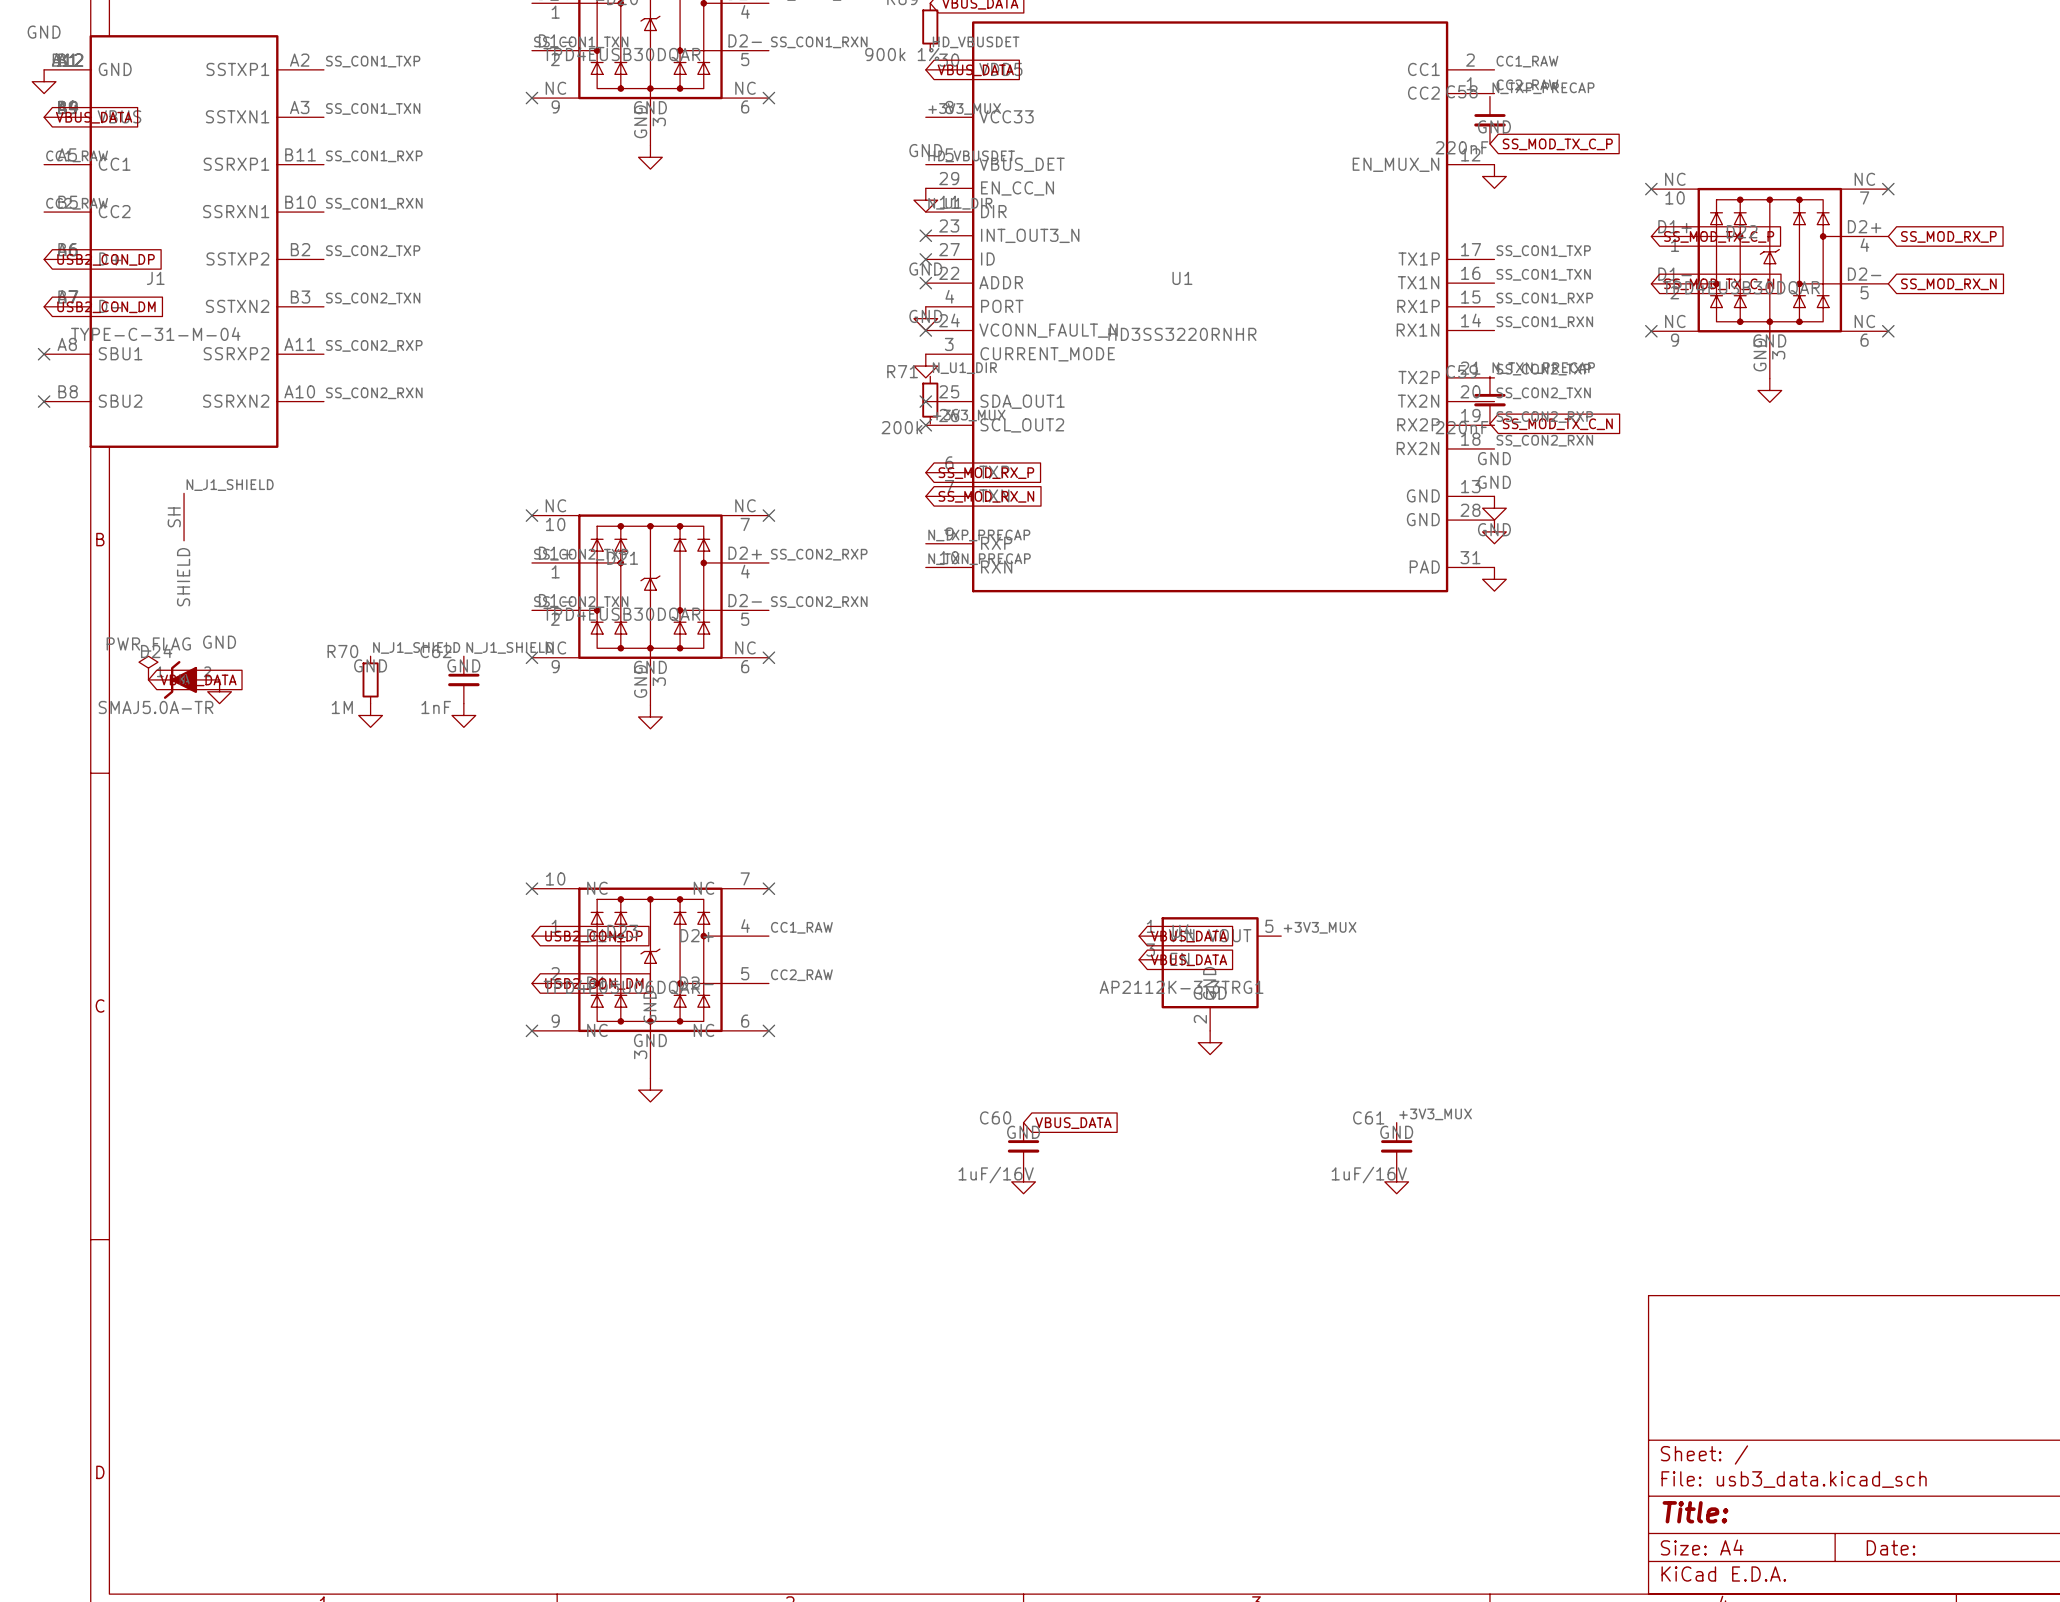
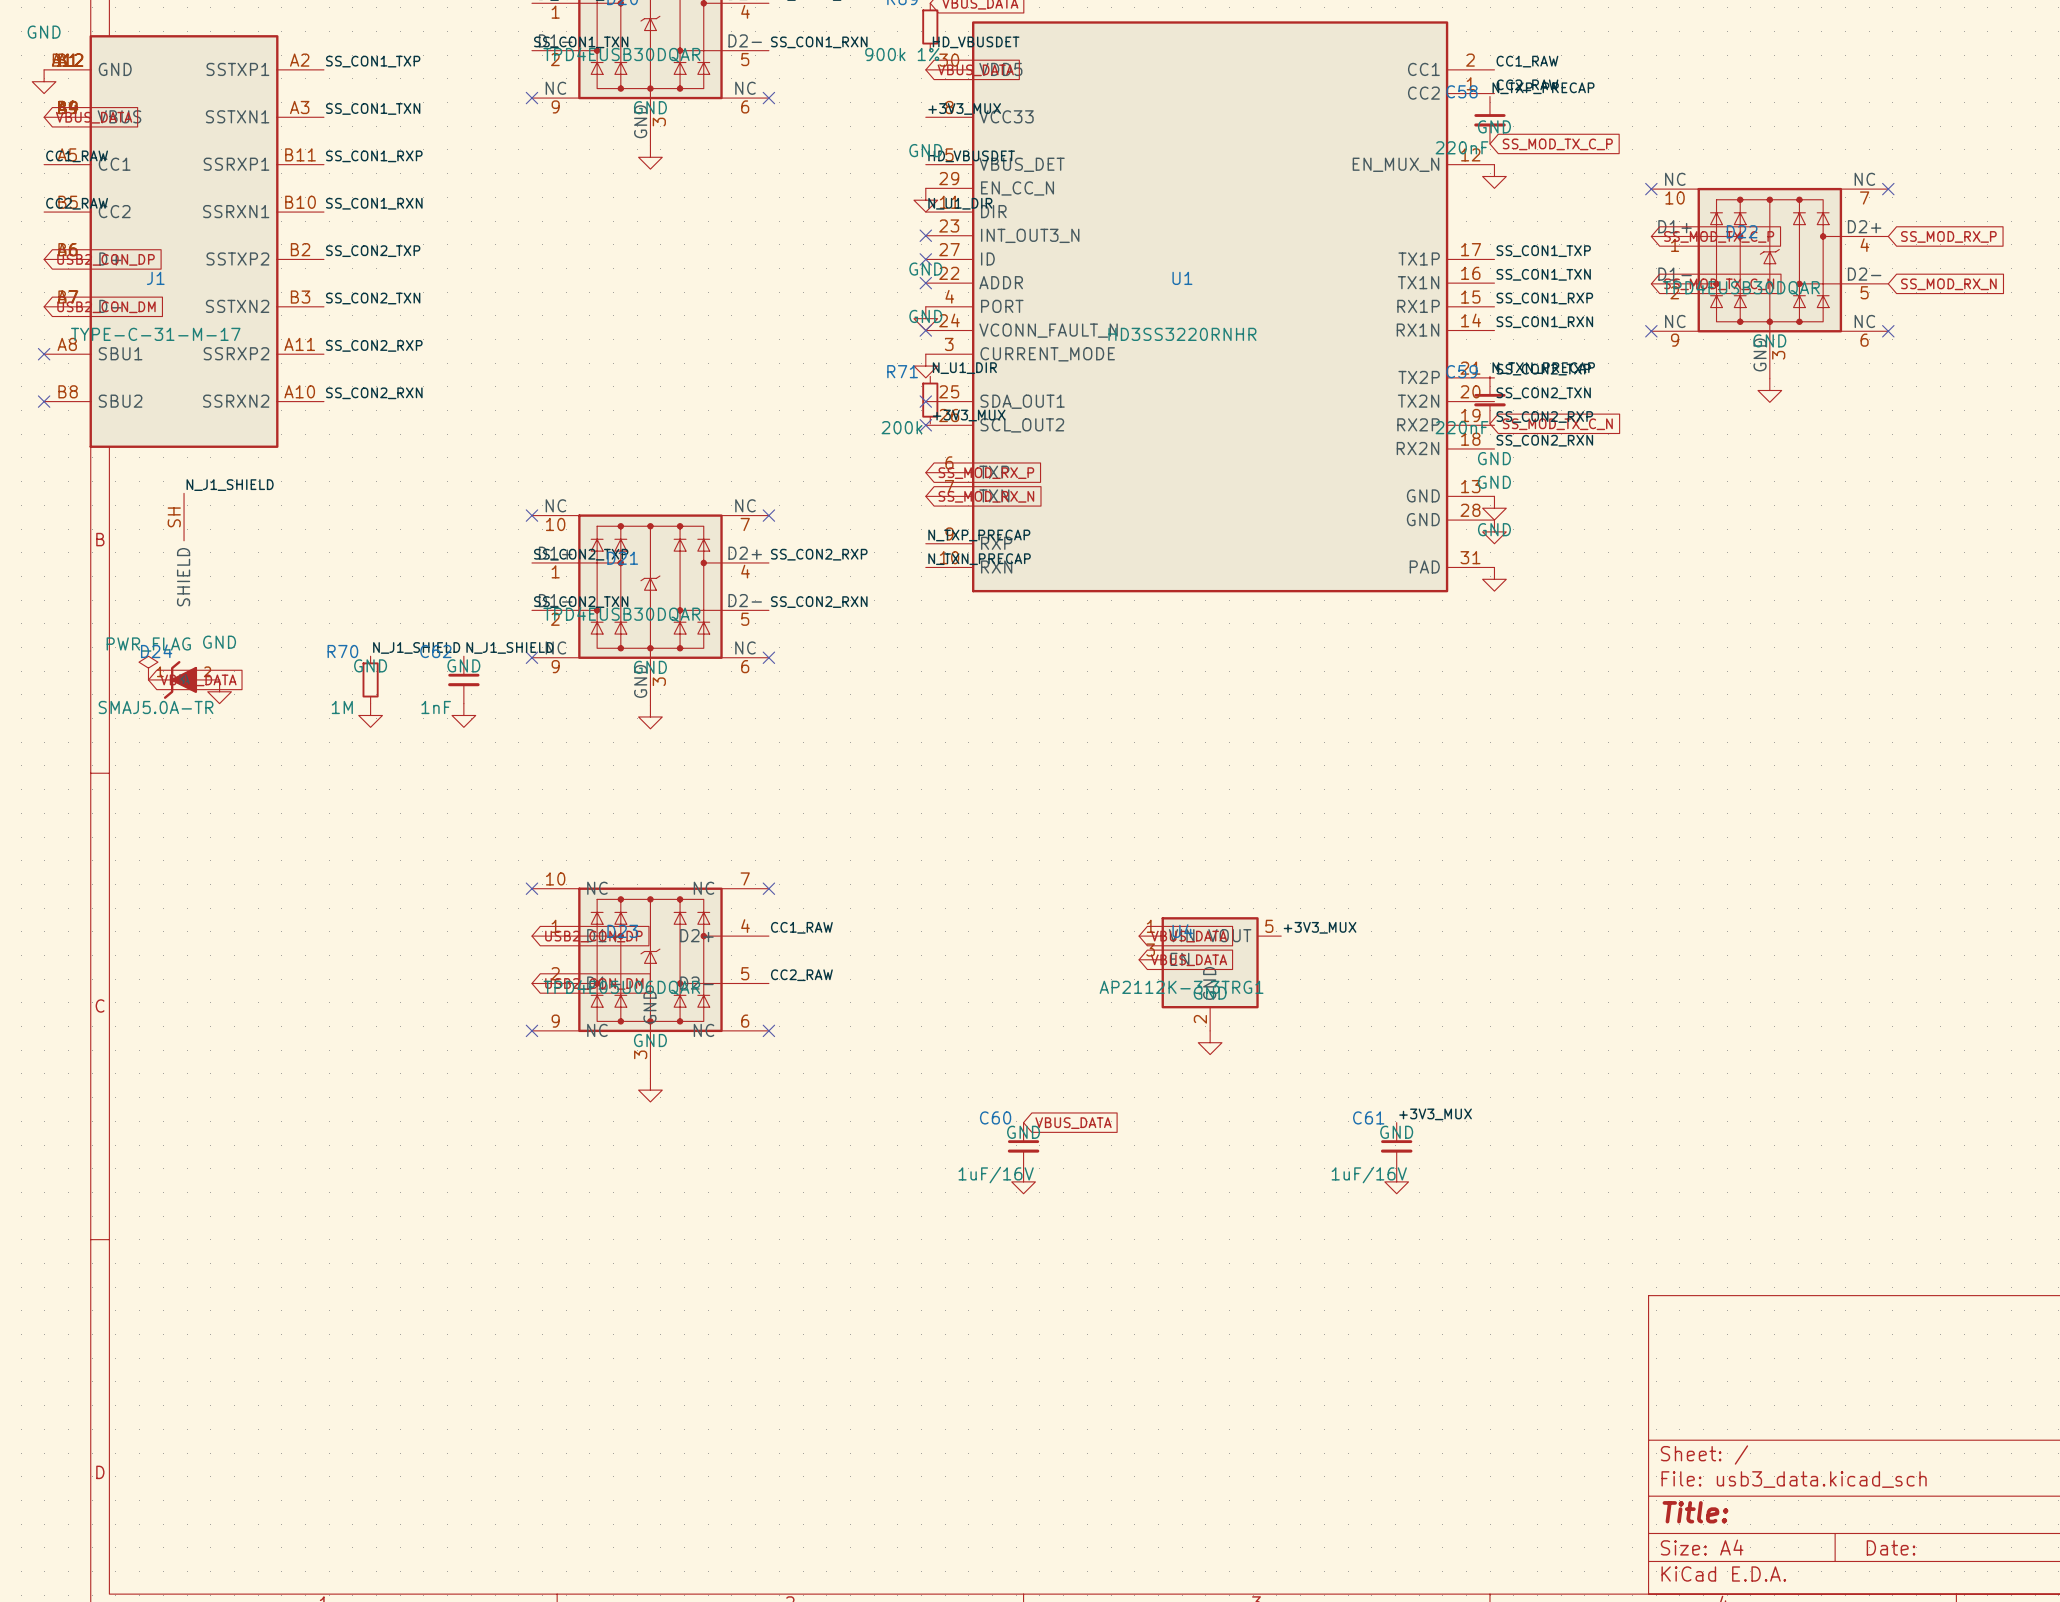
J1 value: TYPE-C-31-M-04 (155, 334) -> TYPE-C-31-M-17 (155, 334)

